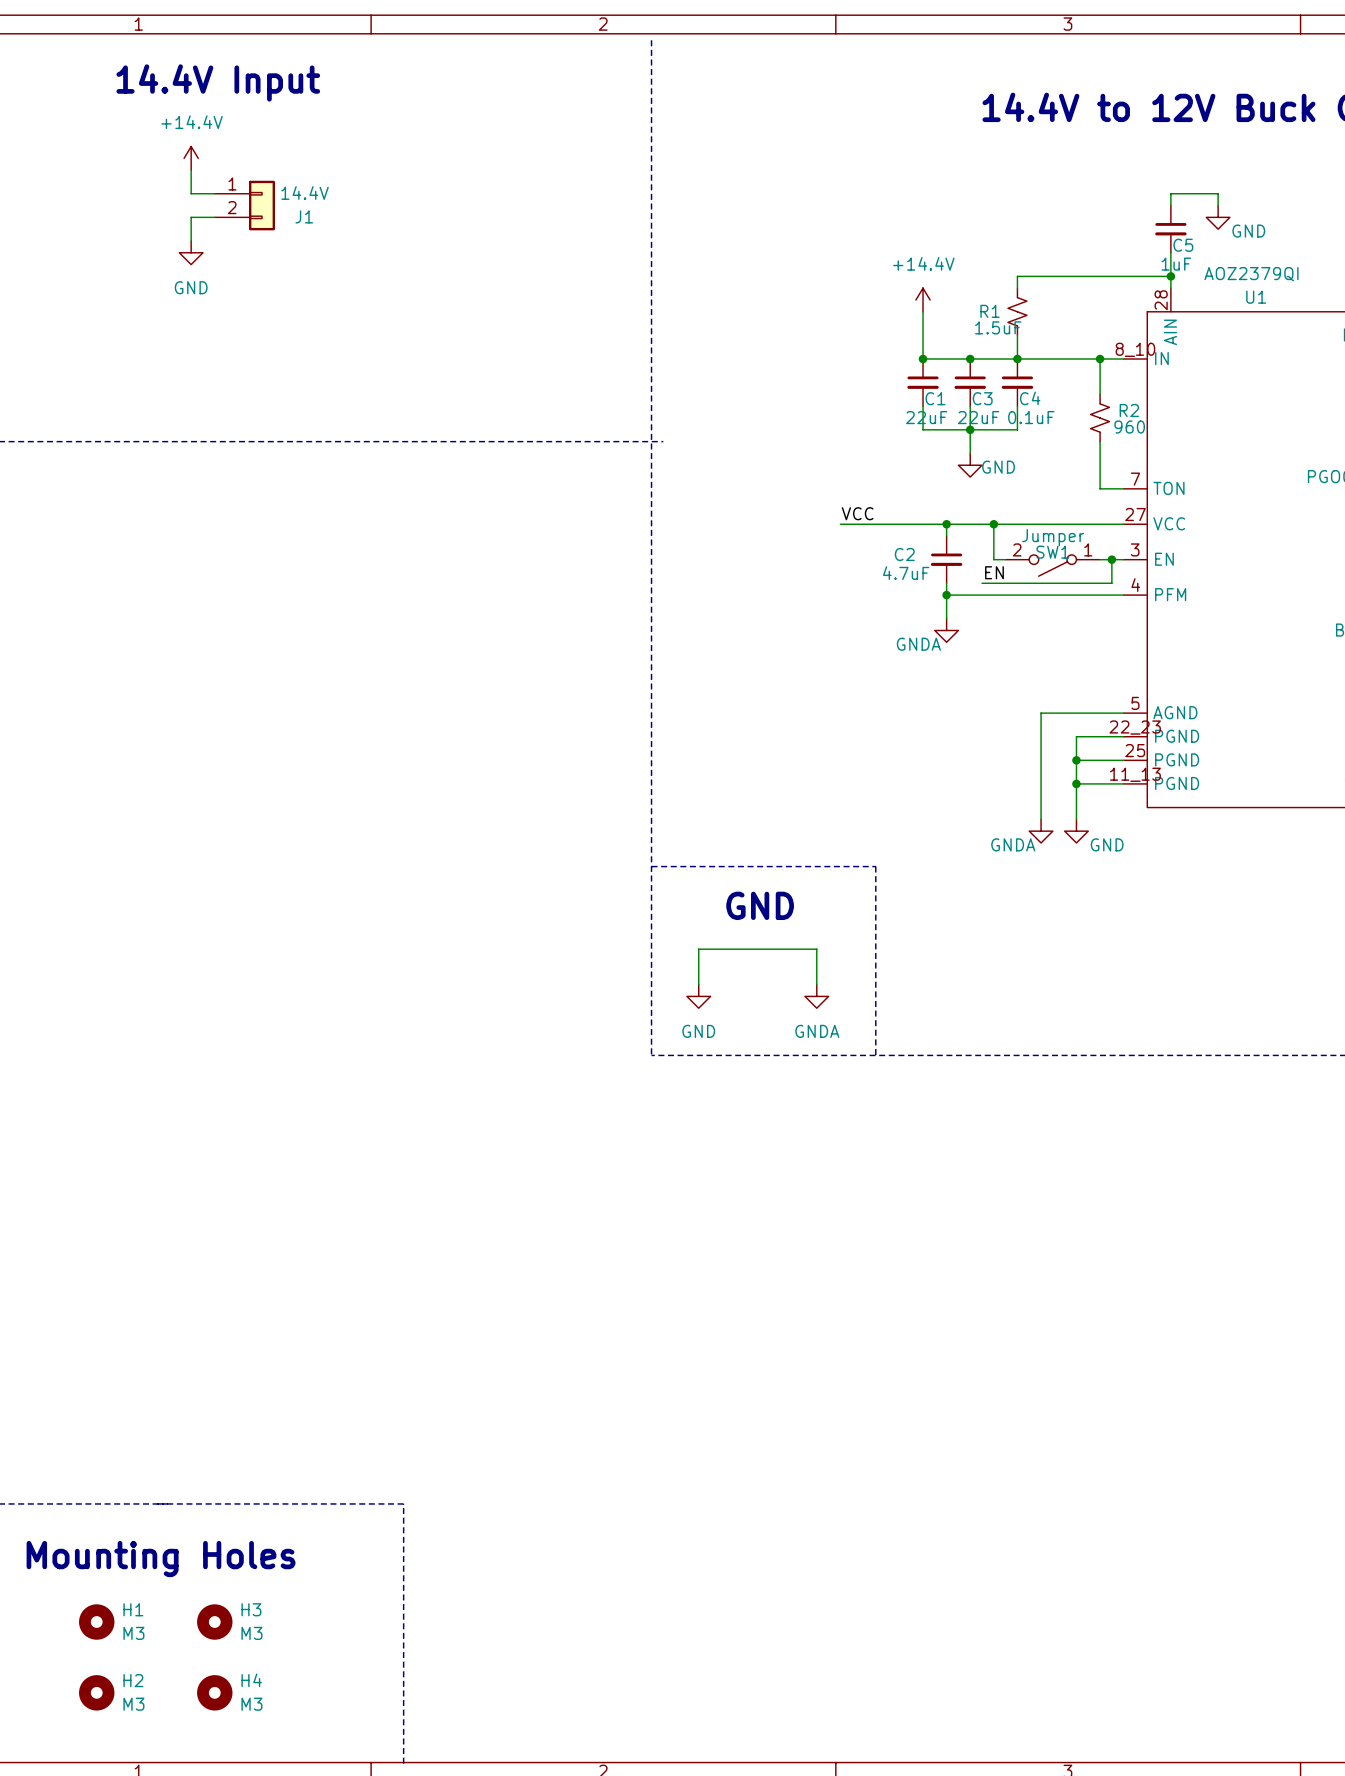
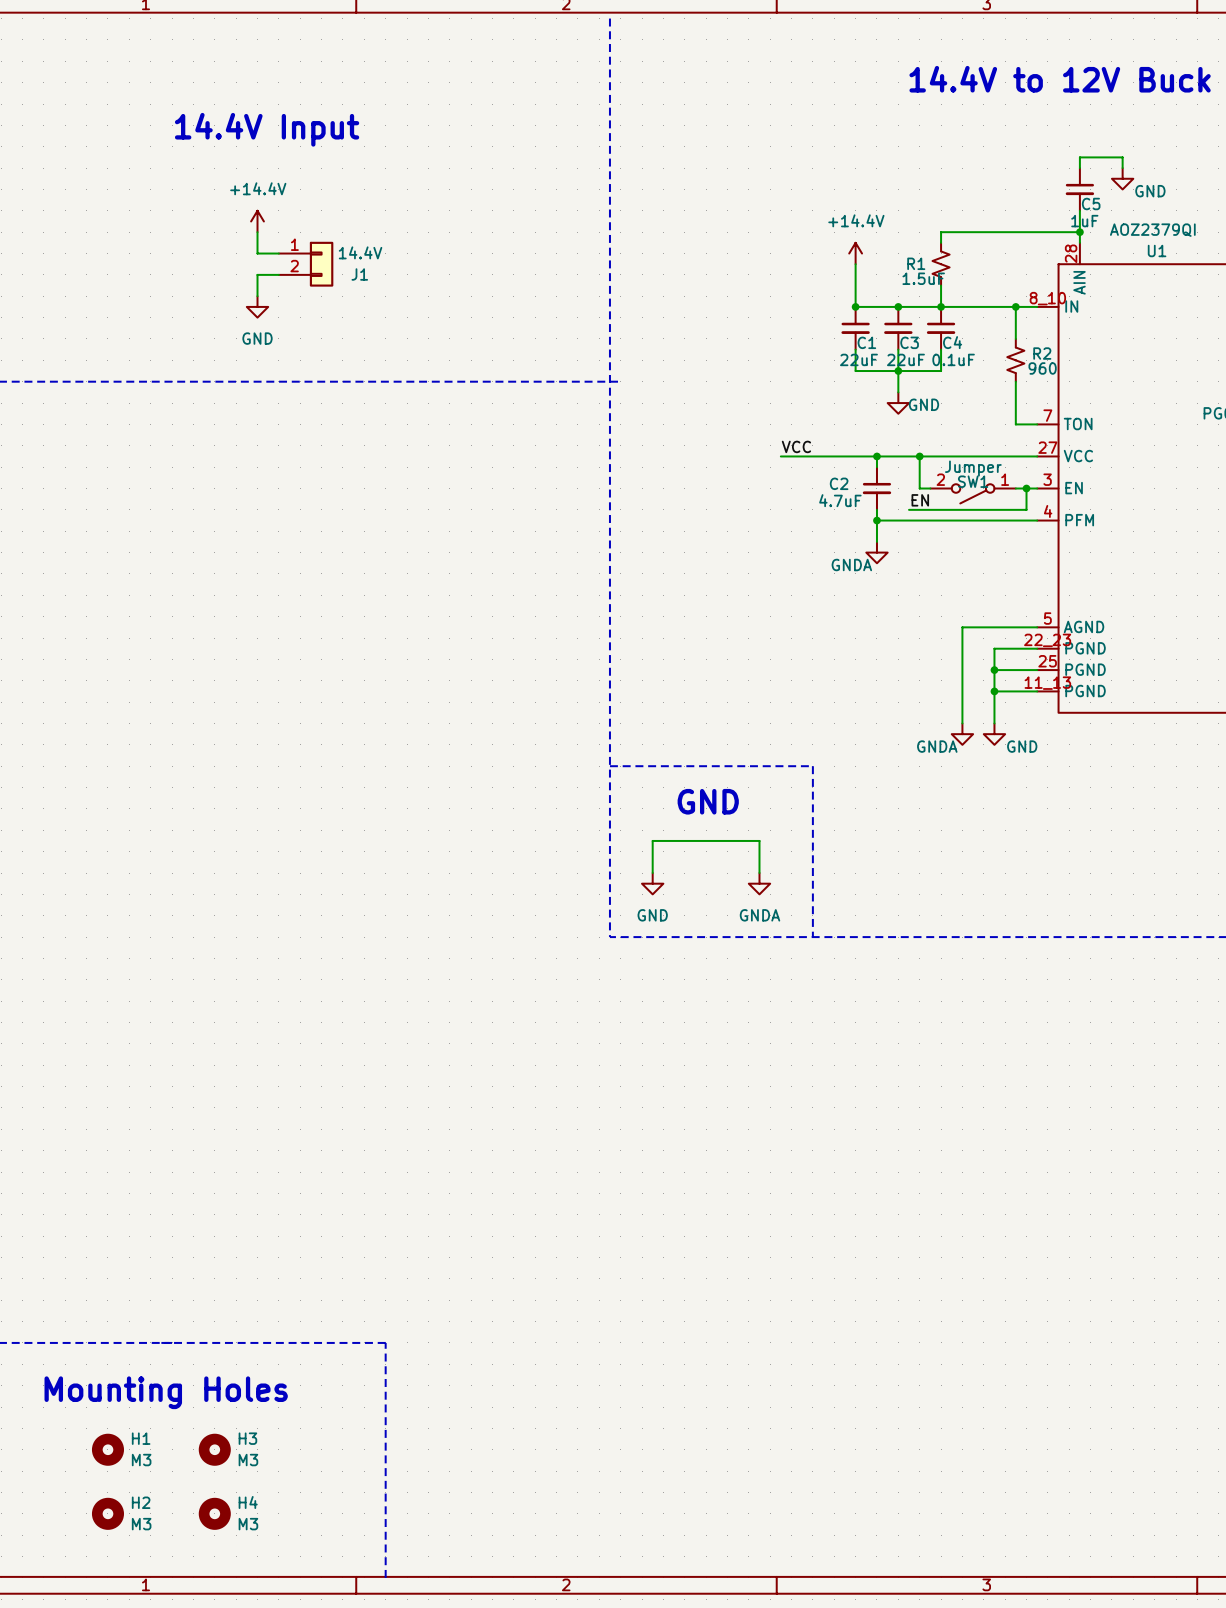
text position: 14.4V Input (218, 82) -> 14.4V Input (267, 129)
power symbol position: +14.4V (191, 158) -> +14.4V (257, 221)
wire: (191, 170) (191, 193) (214, 193) -> (257, 232) (257, 253) (278, 253)
J1 position: (244, 205) -> (306, 264)
wire: (214, 217) (191, 217) (191, 240) -> (278, 274) (257, 274) (257, 296)
power symbol position: GND (191, 252) -> GND (257, 306)

